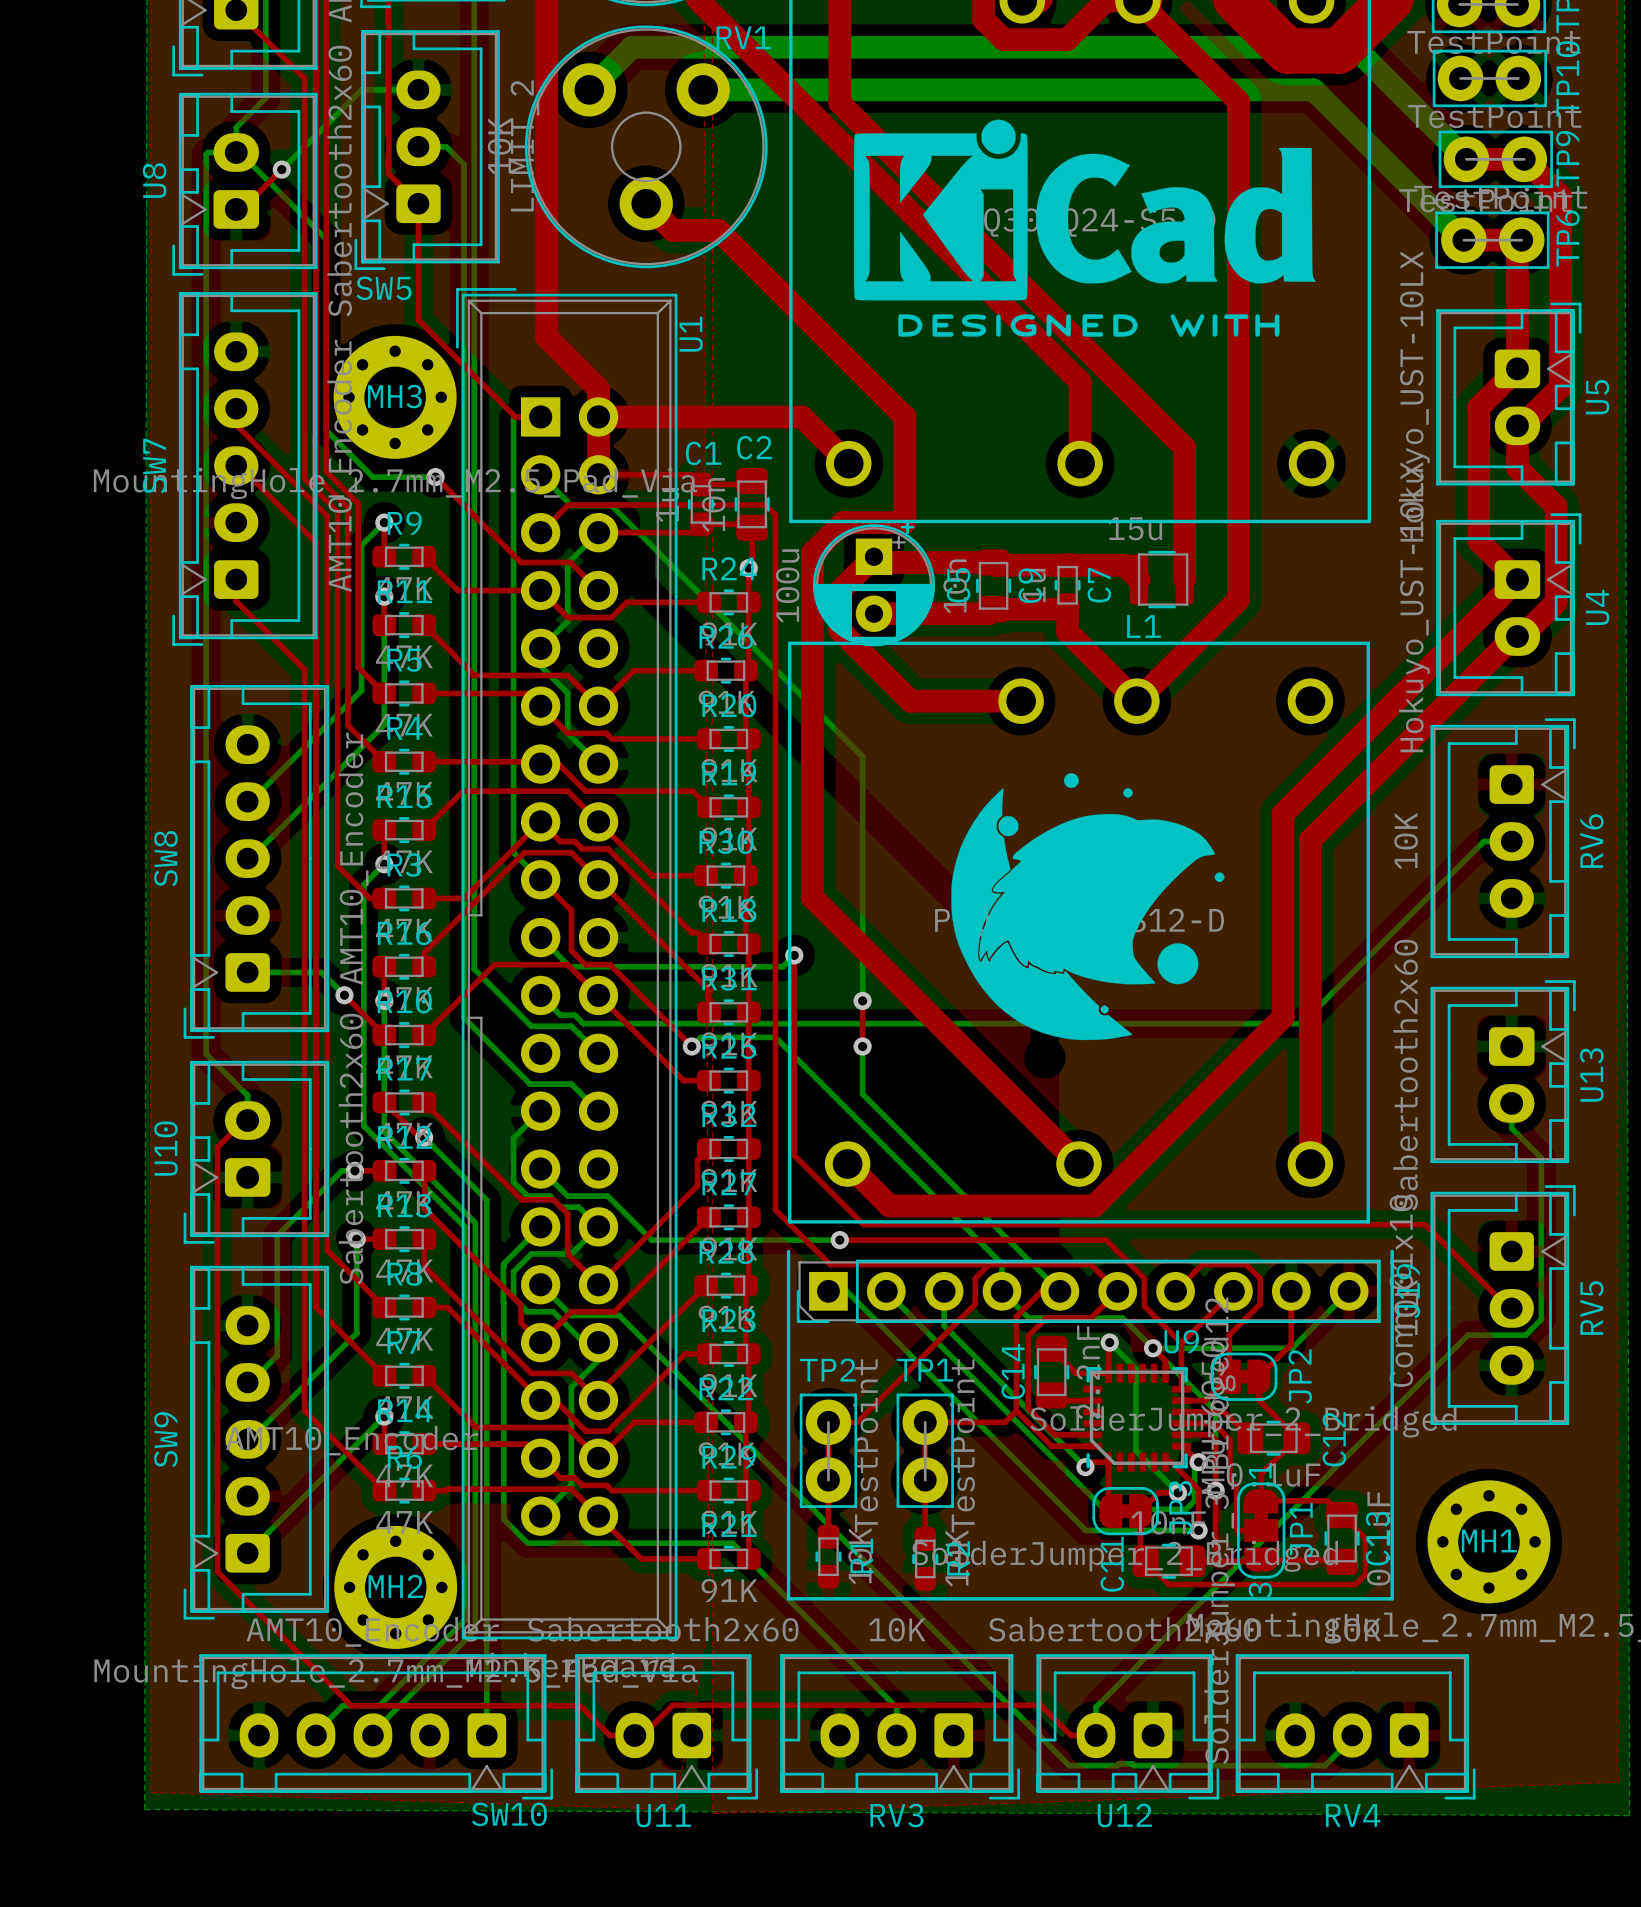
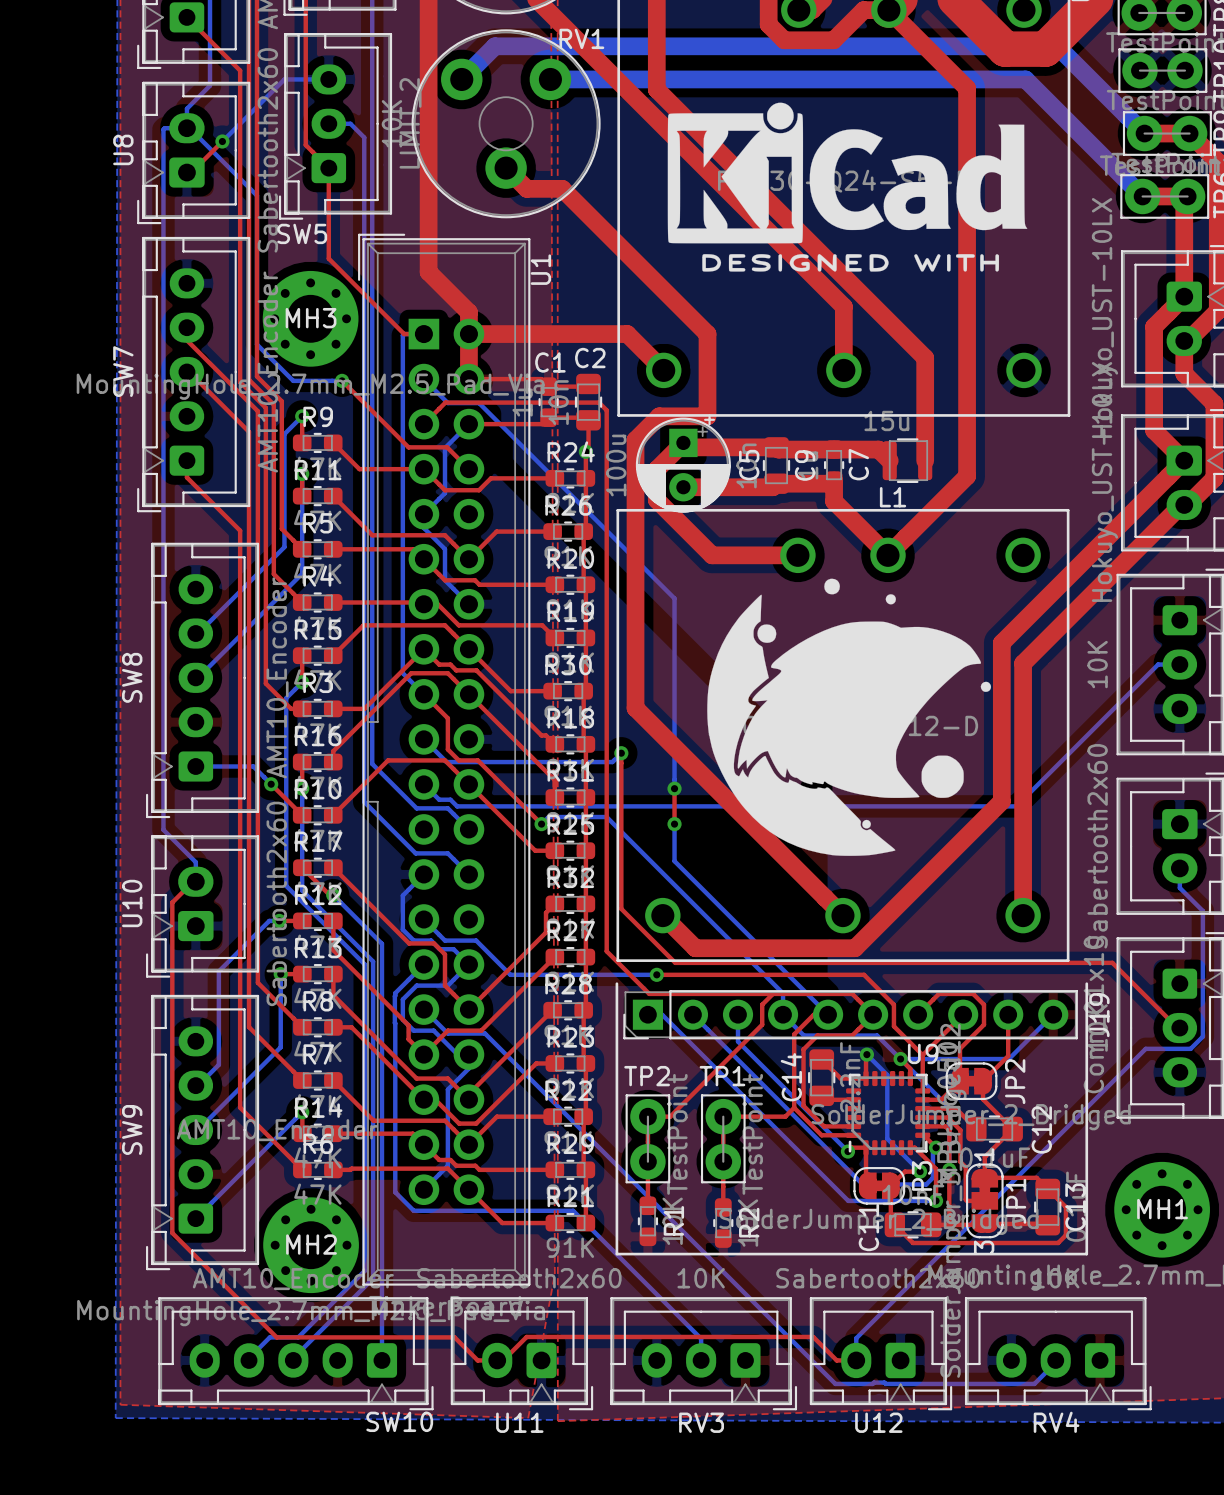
drawing shape: [951, 773, 1225, 1041] -> [707, 578, 992, 856]

